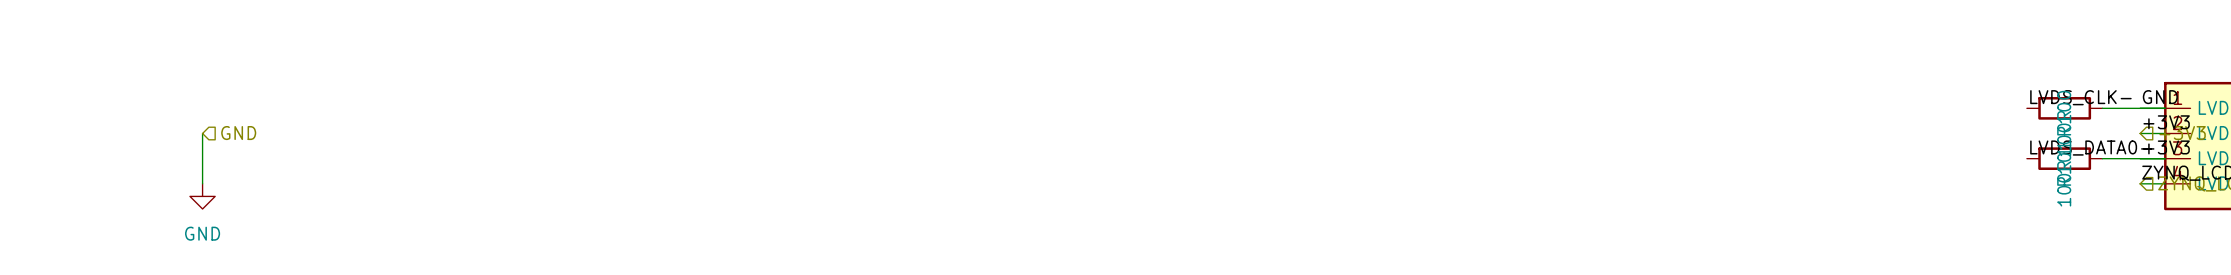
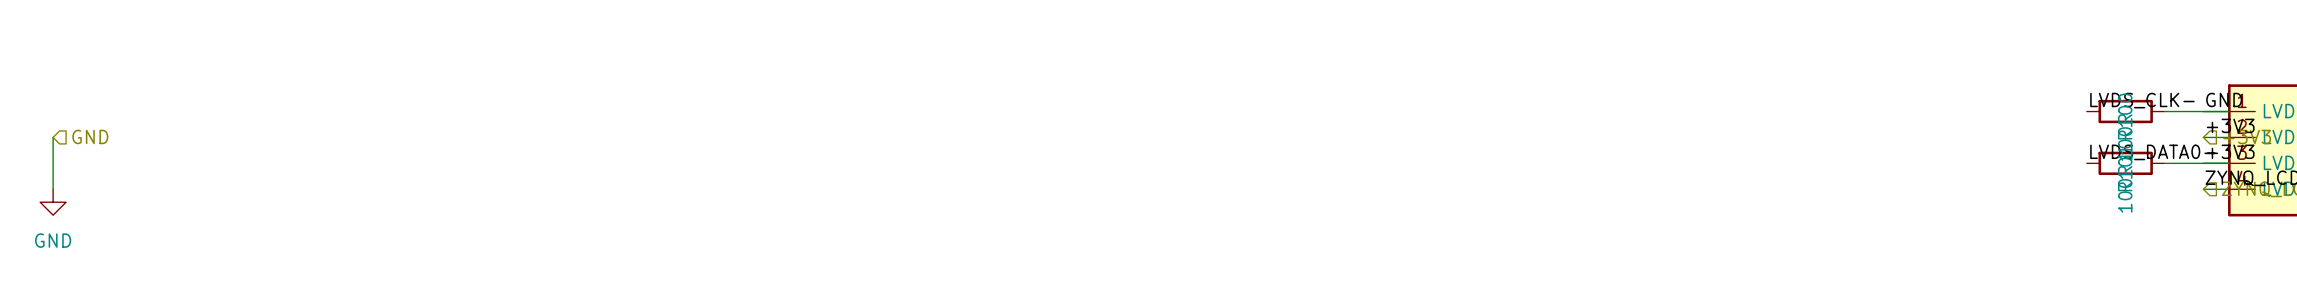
wire: (202, 133) (202, 183) -> (53, 137) (53, 189)
hierarchical label position: GND (238, 133) -> GND (90, 136)
power symbol position: GND (202, 196) -> GND (53, 202)

